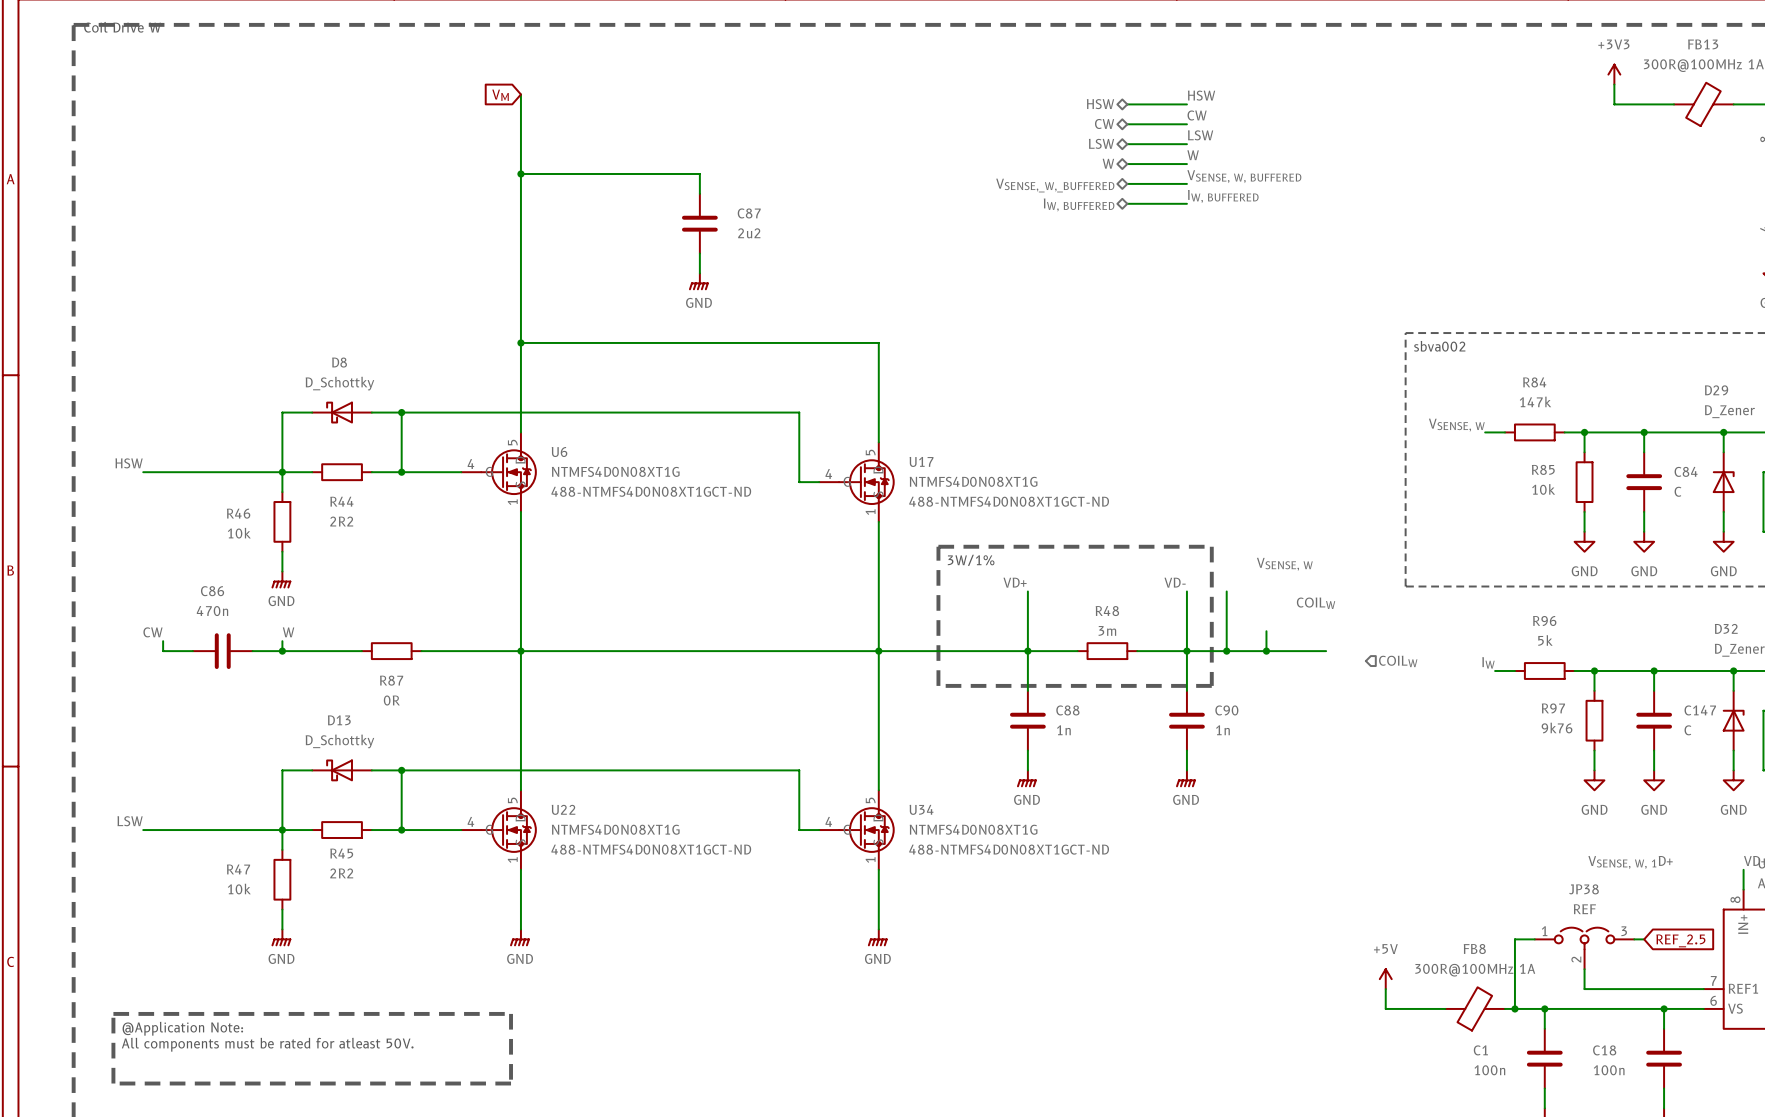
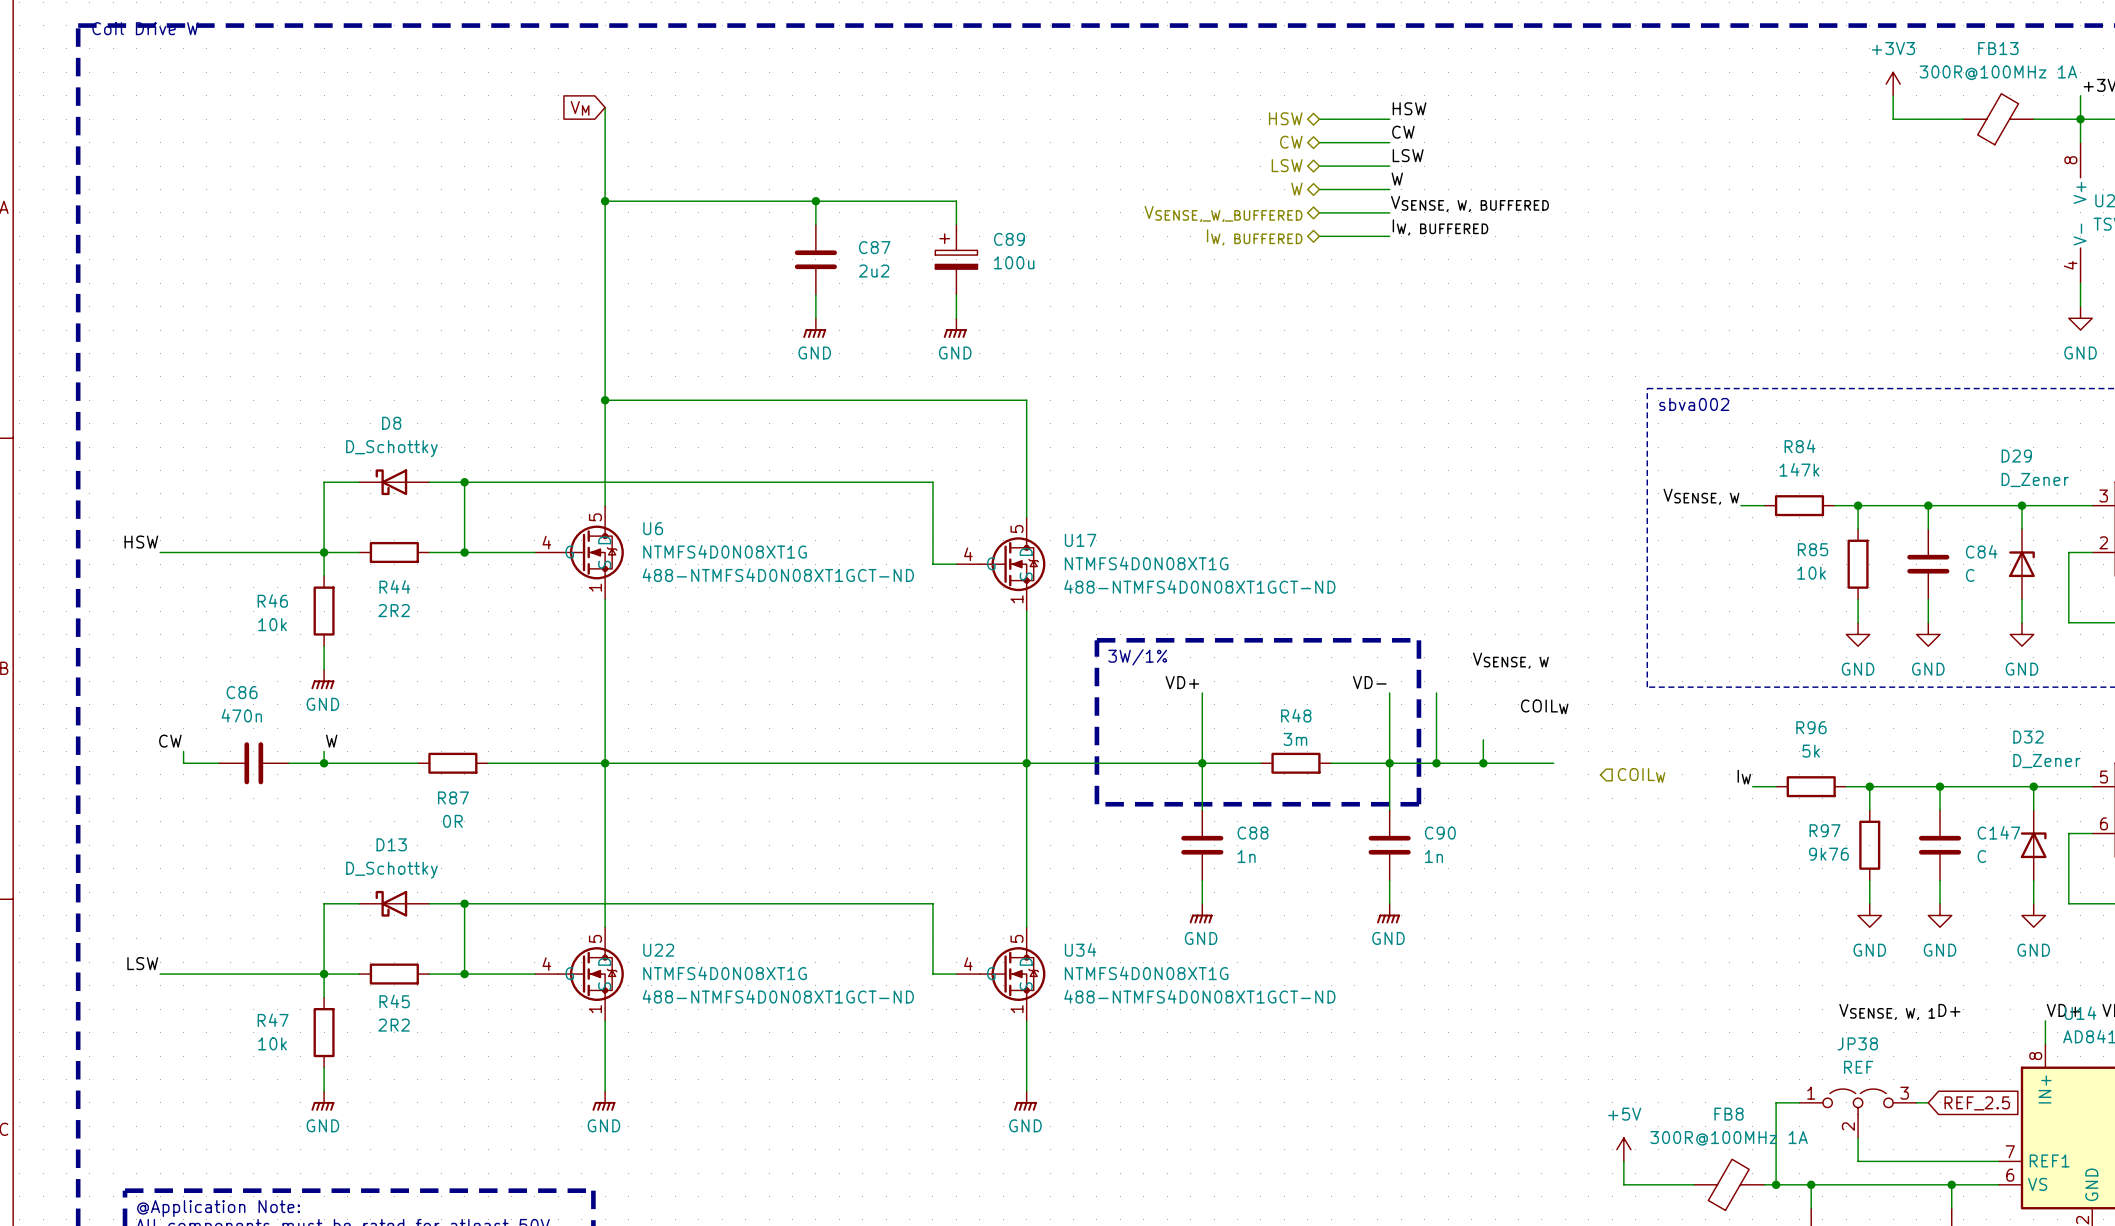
wire: none -> (815, 201) (956, 201) (956, 224)
junction: none -> (815, 201)
C89: none -> 100u (956, 259)
wire: none -> (956, 294) (956, 318)
power symbol: none -> GND (955, 328)

